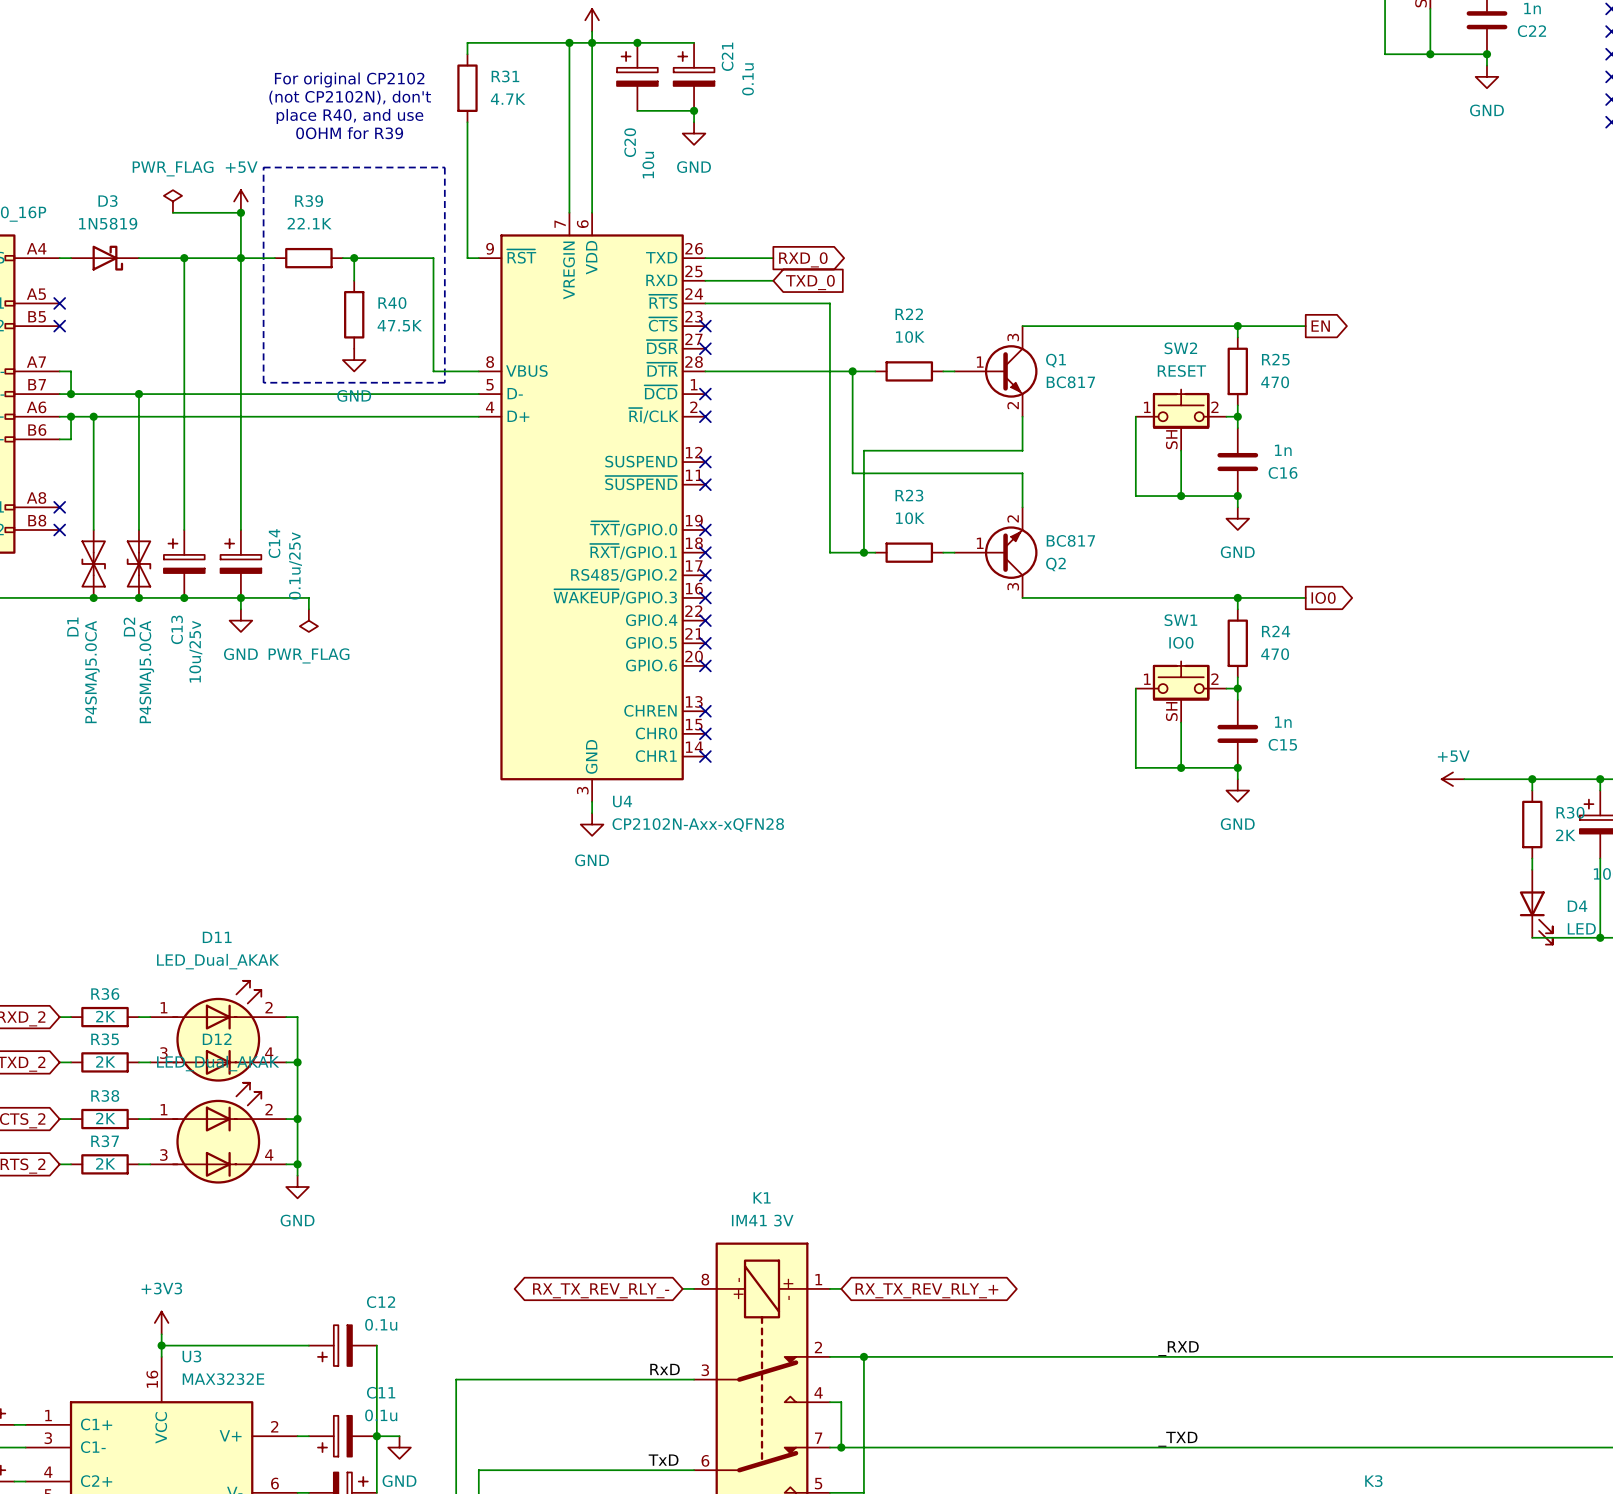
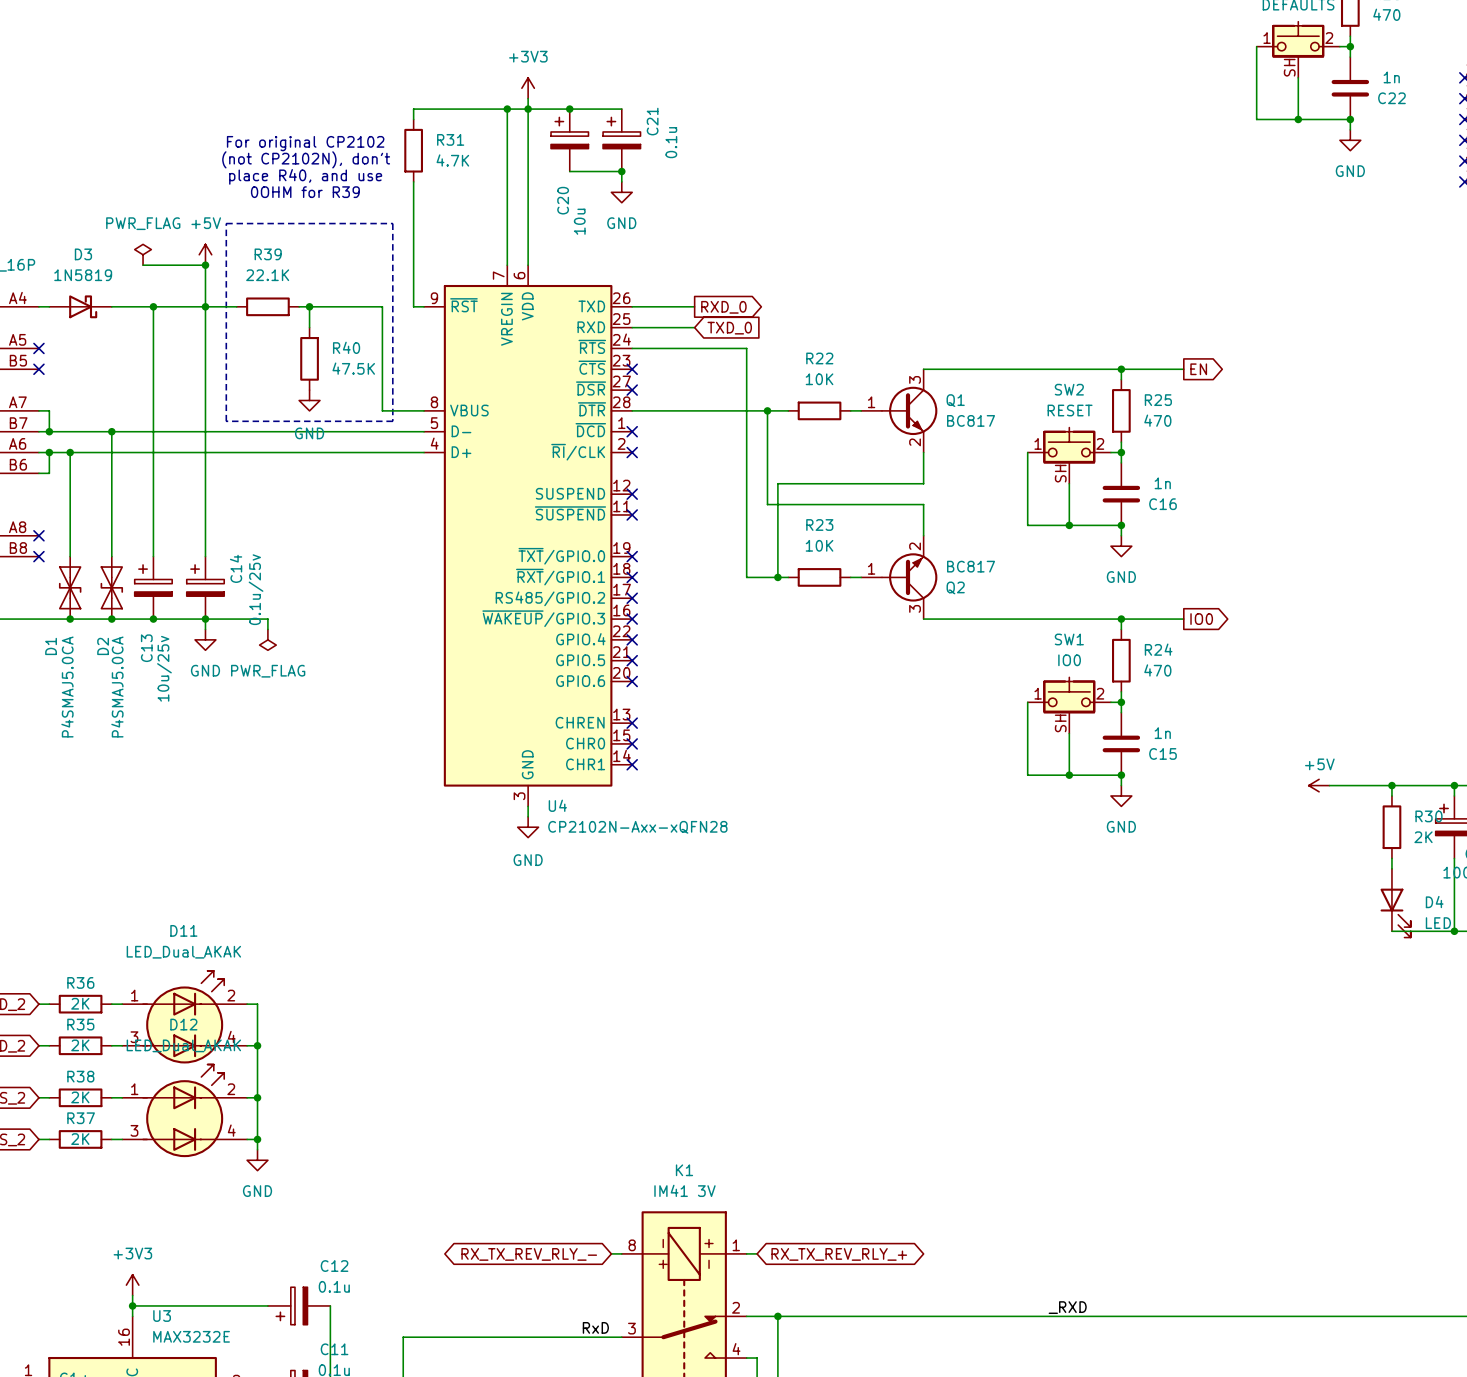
Q1 symbol: [954, 326, 1038, 417] -> [861, 369, 938, 453]
Q2 symbol: [954, 507, 1038, 598] -> [861, 535, 938, 620]

